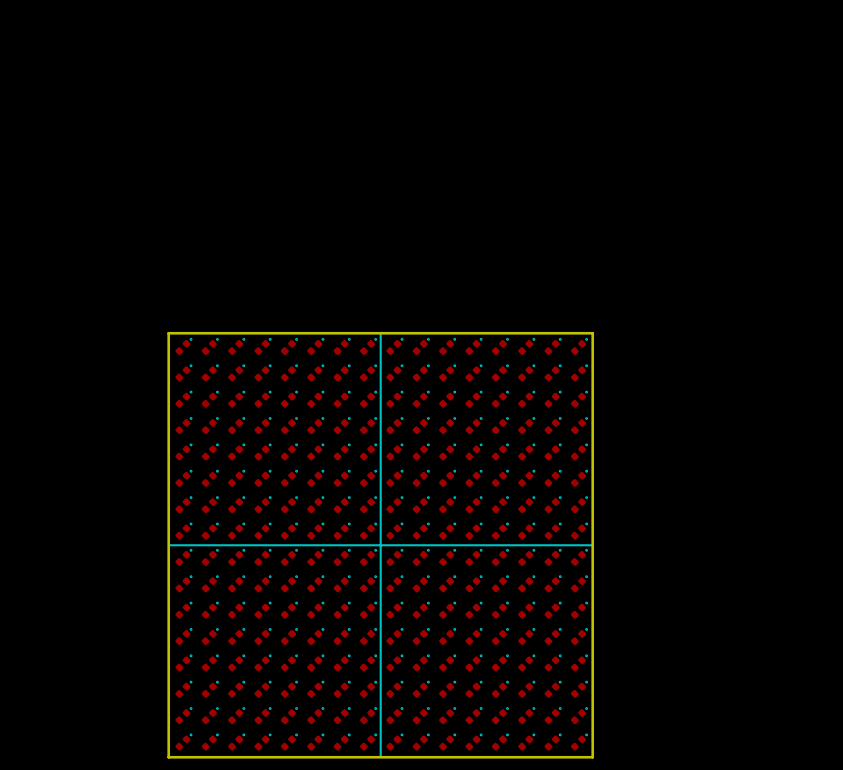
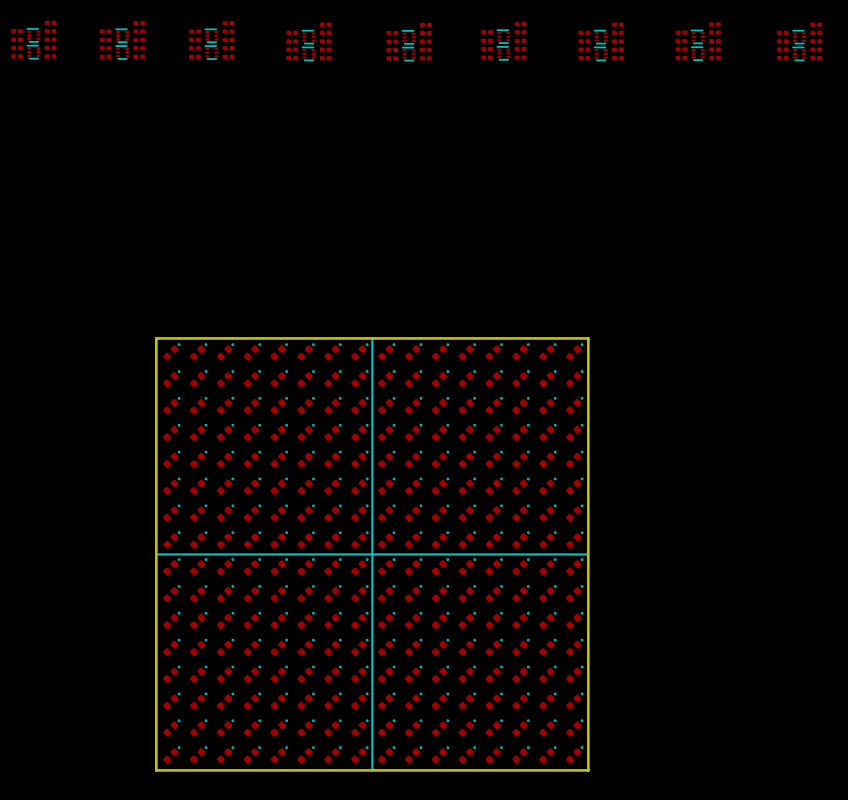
part: none -> (50, 22)
part: none -> (139, 23)
part: none -> (228, 23)
part: none -> (520, 24)
part: none -> (325, 24)
part: none -> (425, 24)
part: none -> (617, 24)
part: none -> (714, 24)
part: none -> (816, 24)
part: none -> (16, 31)
part: none -> (50, 31)
part: none -> (105, 31)
part: none -> (139, 31)
part: none -> (194, 31)
part: none -> (228, 31)
part: none -> (487, 32)
part: none -> (520, 32)
part: none -> (292, 32)
part: none -> (325, 32)
part: none -> (392, 33)
part: none -> (425, 33)
part: none -> (584, 32)
part: none -> (617, 32)
part: none -> (681, 32)
part: none -> (714, 32)
part: none -> (782, 32)
part: none -> (816, 32)
track: none -> (29, 35) (29, 39)
part: none -> (33, 35)
track: none -> (117, 35) (117, 39)
part: none -> (122, 35)
part: none -> (211, 35)
part: none -> (503, 36)
part: none -> (308, 37)
part: none -> (408, 37)
part: none -> (600, 37)
part: none -> (697, 36)
part: none -> (799, 37)
part: none -> (16, 39)
part: none -> (50, 39)
part: none -> (105, 40)
part: none -> (139, 40)
part: none -> (194, 39)
part: none -> (228, 40)
part: none -> (292, 41)
part: none -> (325, 41)
part: none -> (392, 41)
part: none -> (425, 41)
part: none -> (487, 40)
part: none -> (520, 40)
part: none -> (584, 41)
part: none -> (617, 41)
part: none -> (681, 41)
part: none -> (714, 41)
part: none -> (782, 41)
part: none -> (816, 41)
part: none -> (16, 47)
track: none -> (38, 48) (38, 52)
part: none -> (50, 47)
part: none -> (105, 48)
track: none -> (127, 48) (127, 52)
part: none -> (139, 48)
part: none -> (194, 48)
part: none -> (228, 48)
part: none -> (292, 49)
part: none -> (325, 49)
part: none -> (425, 49)
part: none -> (487, 49)
part: none -> (520, 49)
part: none -> (584, 49)
part: none -> (617, 49)
part: none -> (681, 49)
part: none -> (714, 49)
part: none -> (782, 49)
part: none -> (816, 49)
part: none -> (392, 49)
part: none -> (33, 52)
part: none -> (122, 52)
part: none -> (211, 52)
part: none -> (308, 53)
part: none -> (503, 53)
part: none -> (600, 53)
part: none -> (697, 53)
part: none -> (799, 53)
part: none -> (408, 54)
part: none -> (16, 56)
part: none -> (50, 56)
part: none -> (105, 56)
part: none -> (139, 56)
part: none -> (194, 56)
part: none -> (228, 56)
part: none -> (487, 57)
part: none -> (520, 57)
part: none -> (681, 57)
part: none -> (714, 57)
part: none -> (292, 58)
part: none -> (325, 58)
part: none -> (392, 58)
part: none -> (425, 58)
part: none -> (584, 58)
part: none -> (617, 58)
part: none -> (782, 58)
part: none -> (816, 58)

